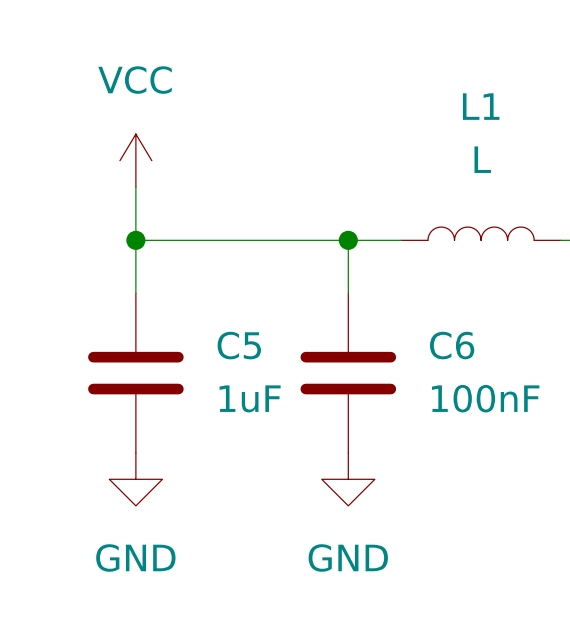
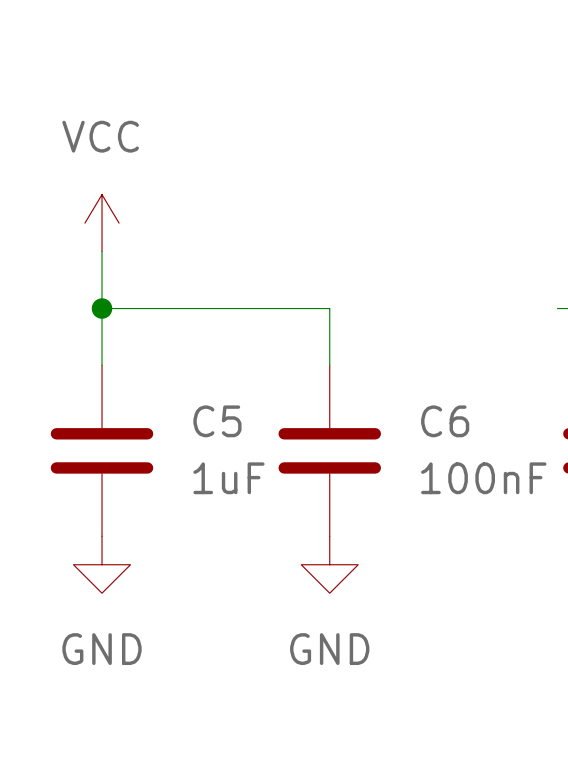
L1: L (481, 233) -> none
wire: (348, 240) (401, 240) -> none
junction: (348, 240) -> none

